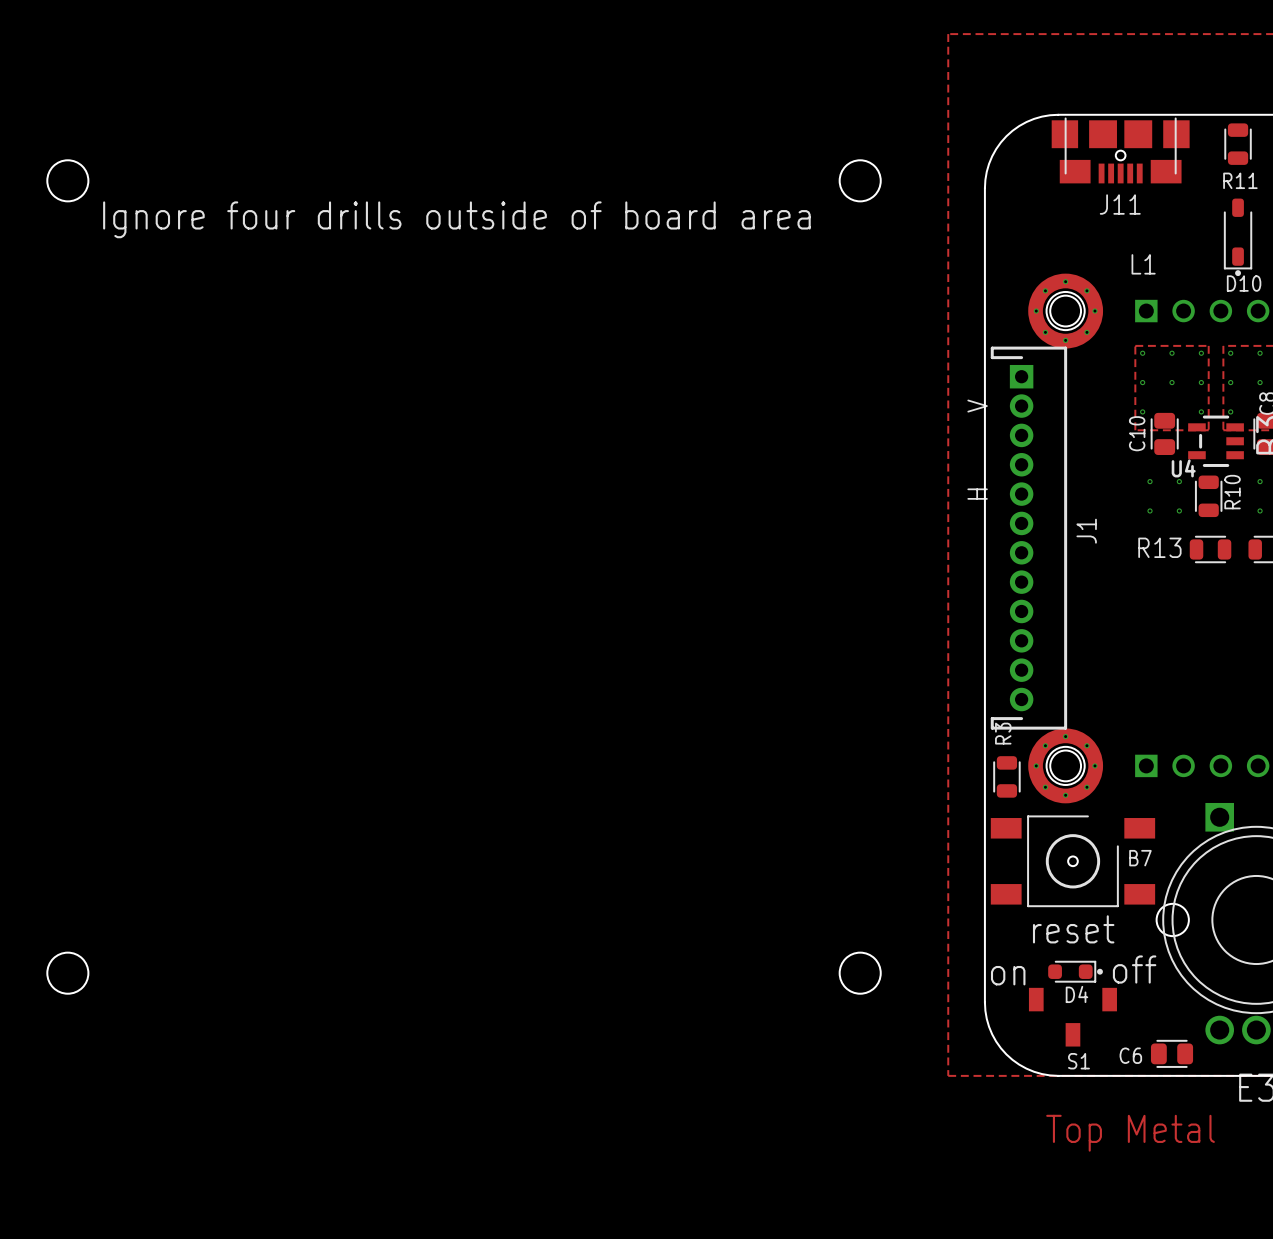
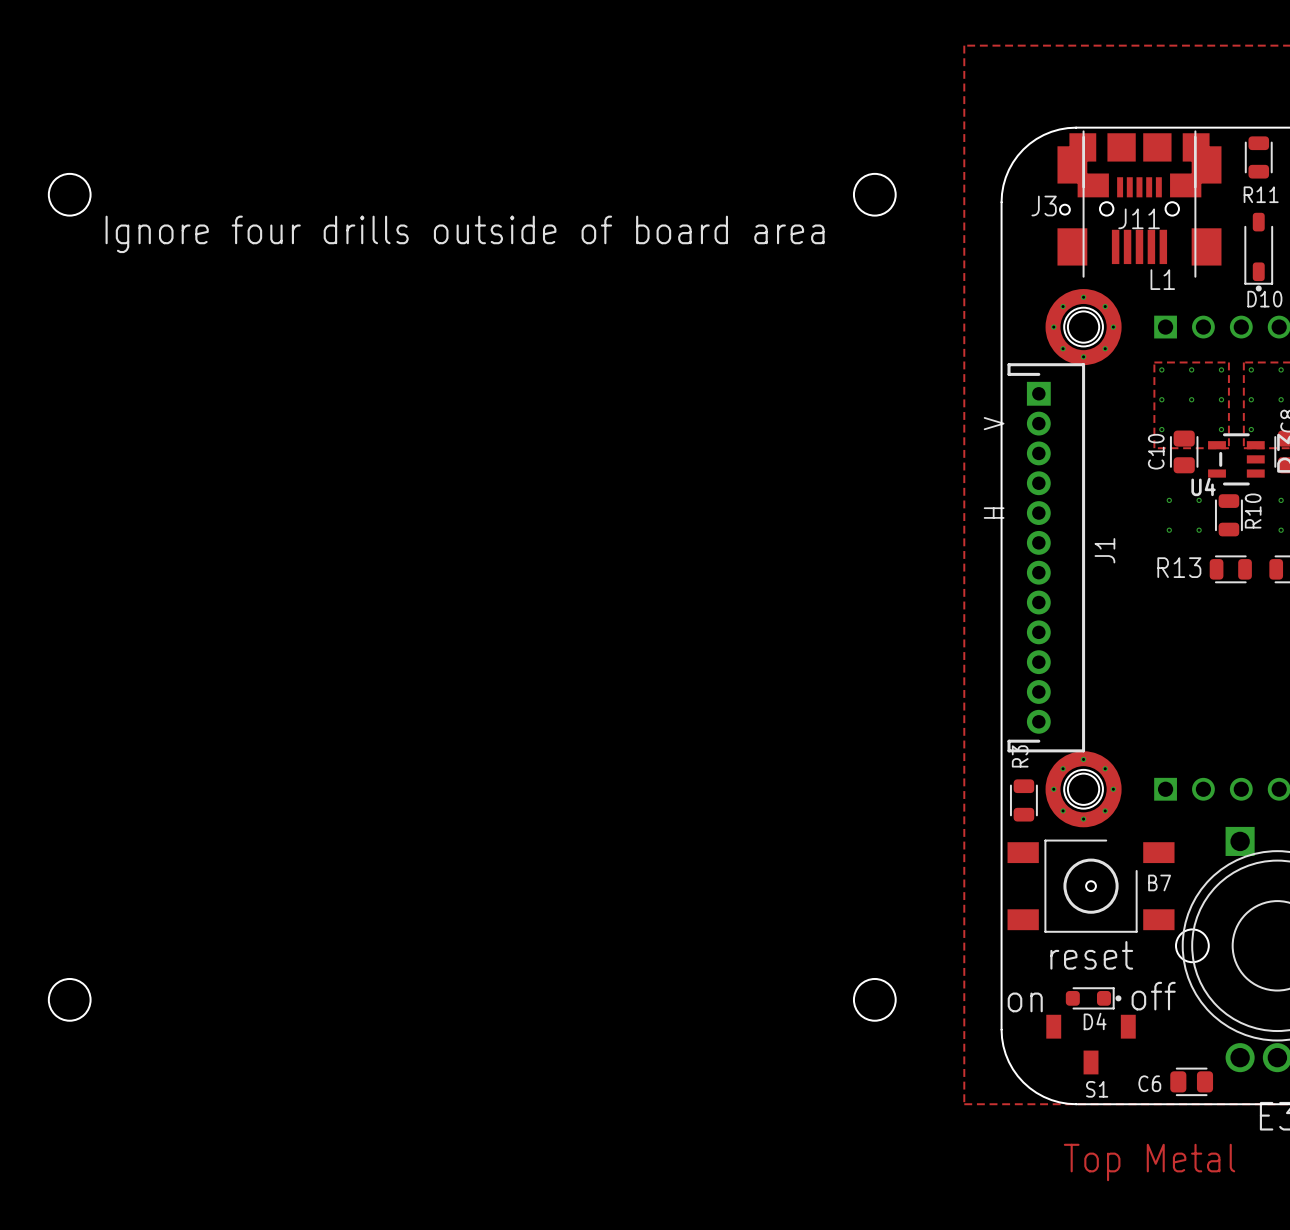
part position: (1120, 155) -> (1064, 209)
J3: none -> (1139, 206)

